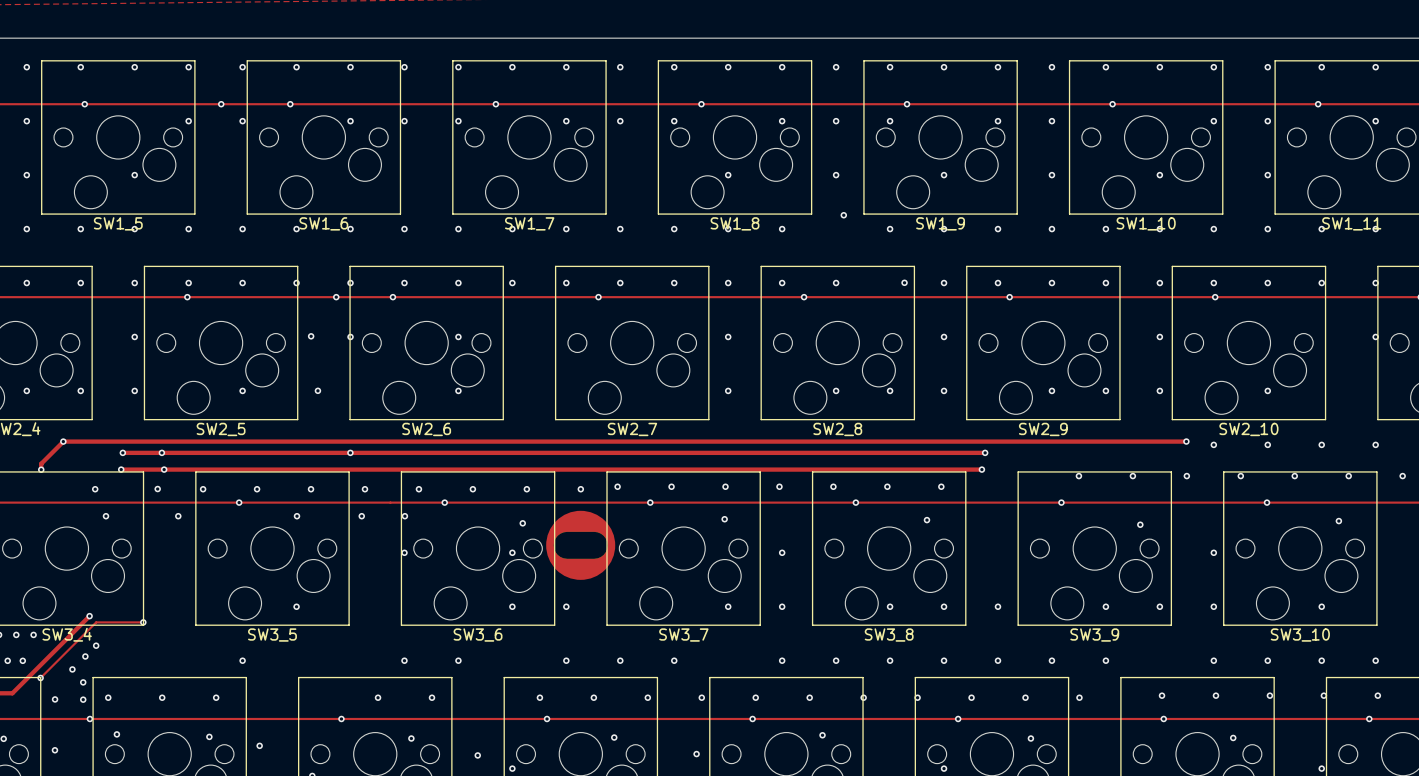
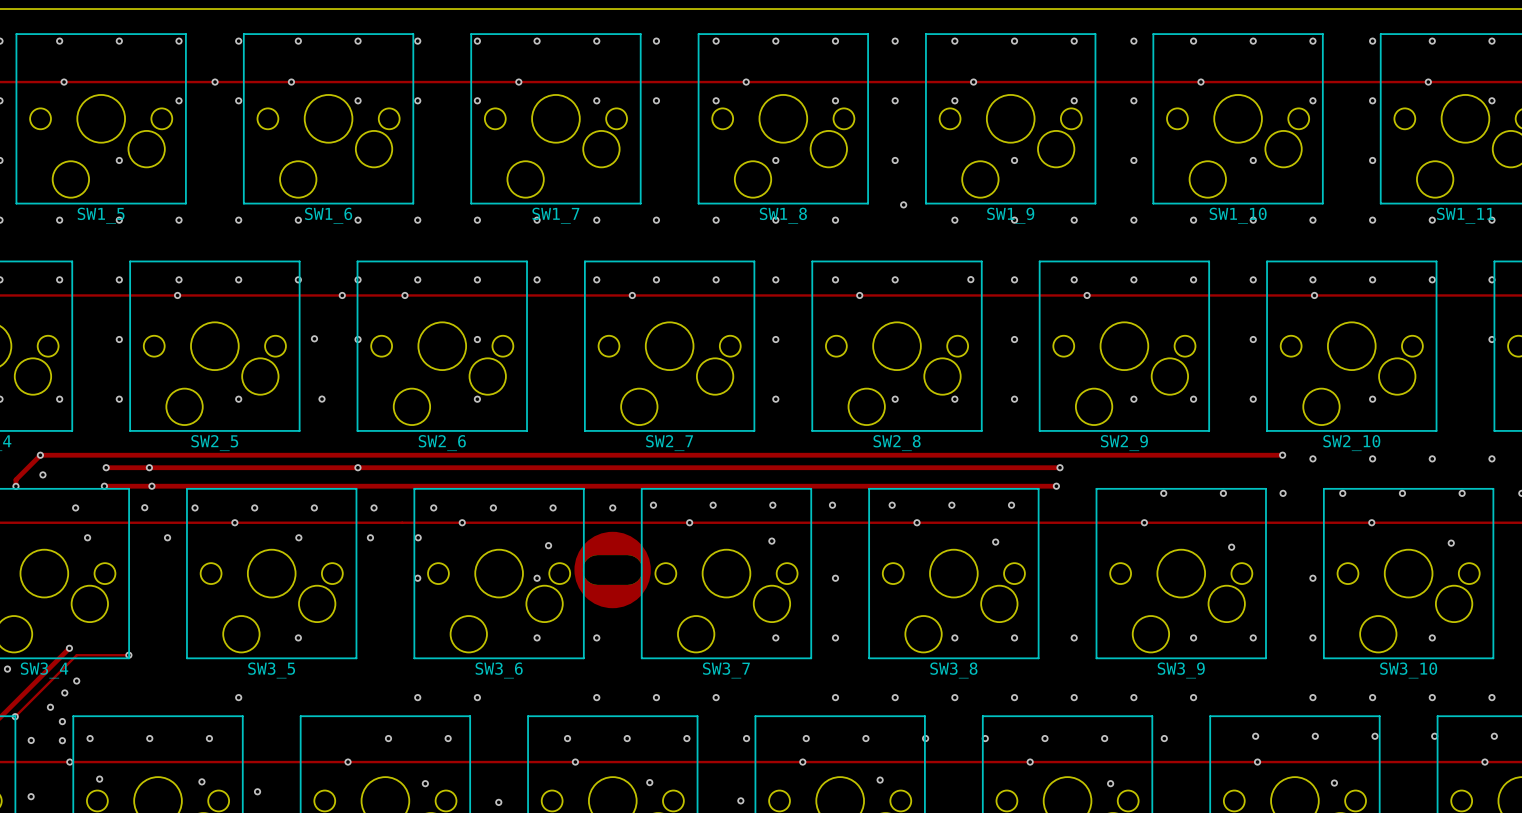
via: none -> (42, 474)

